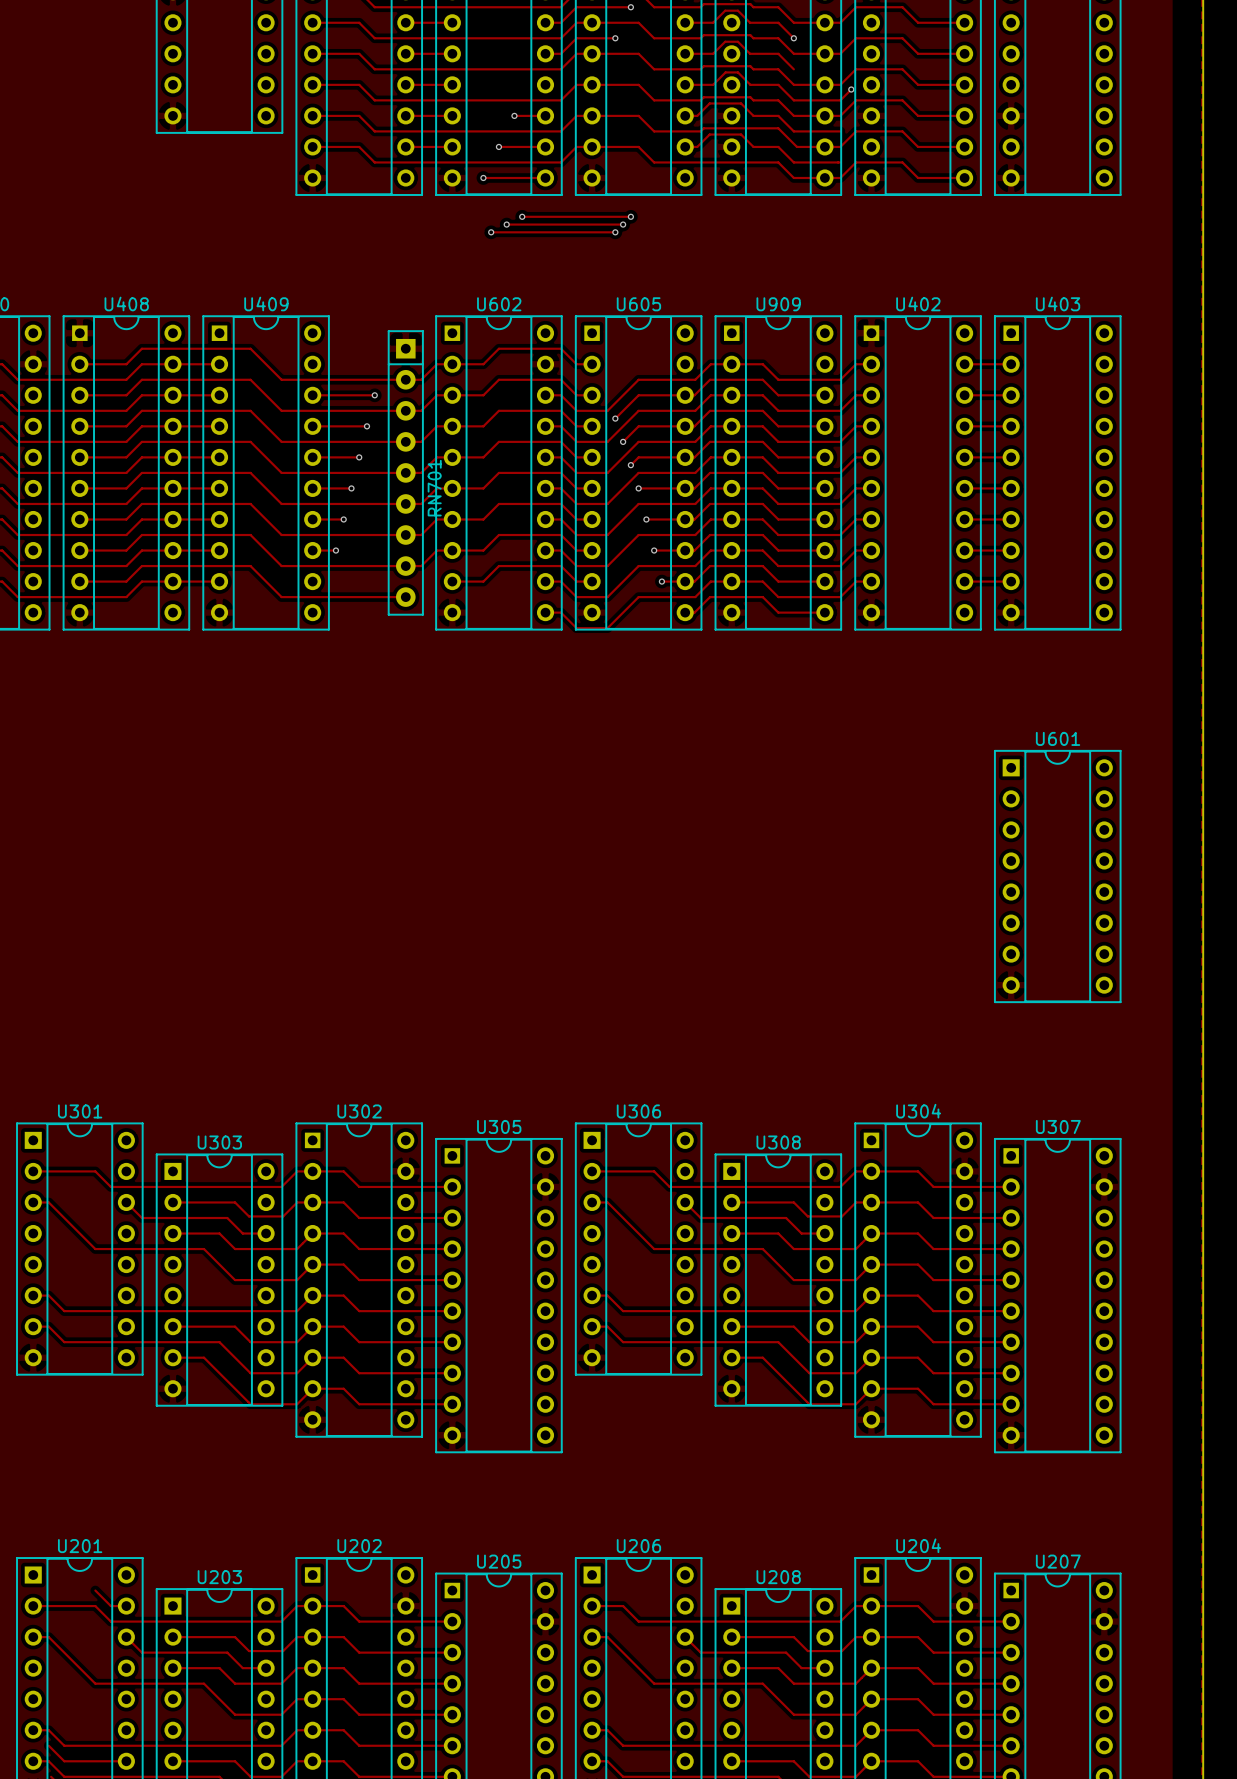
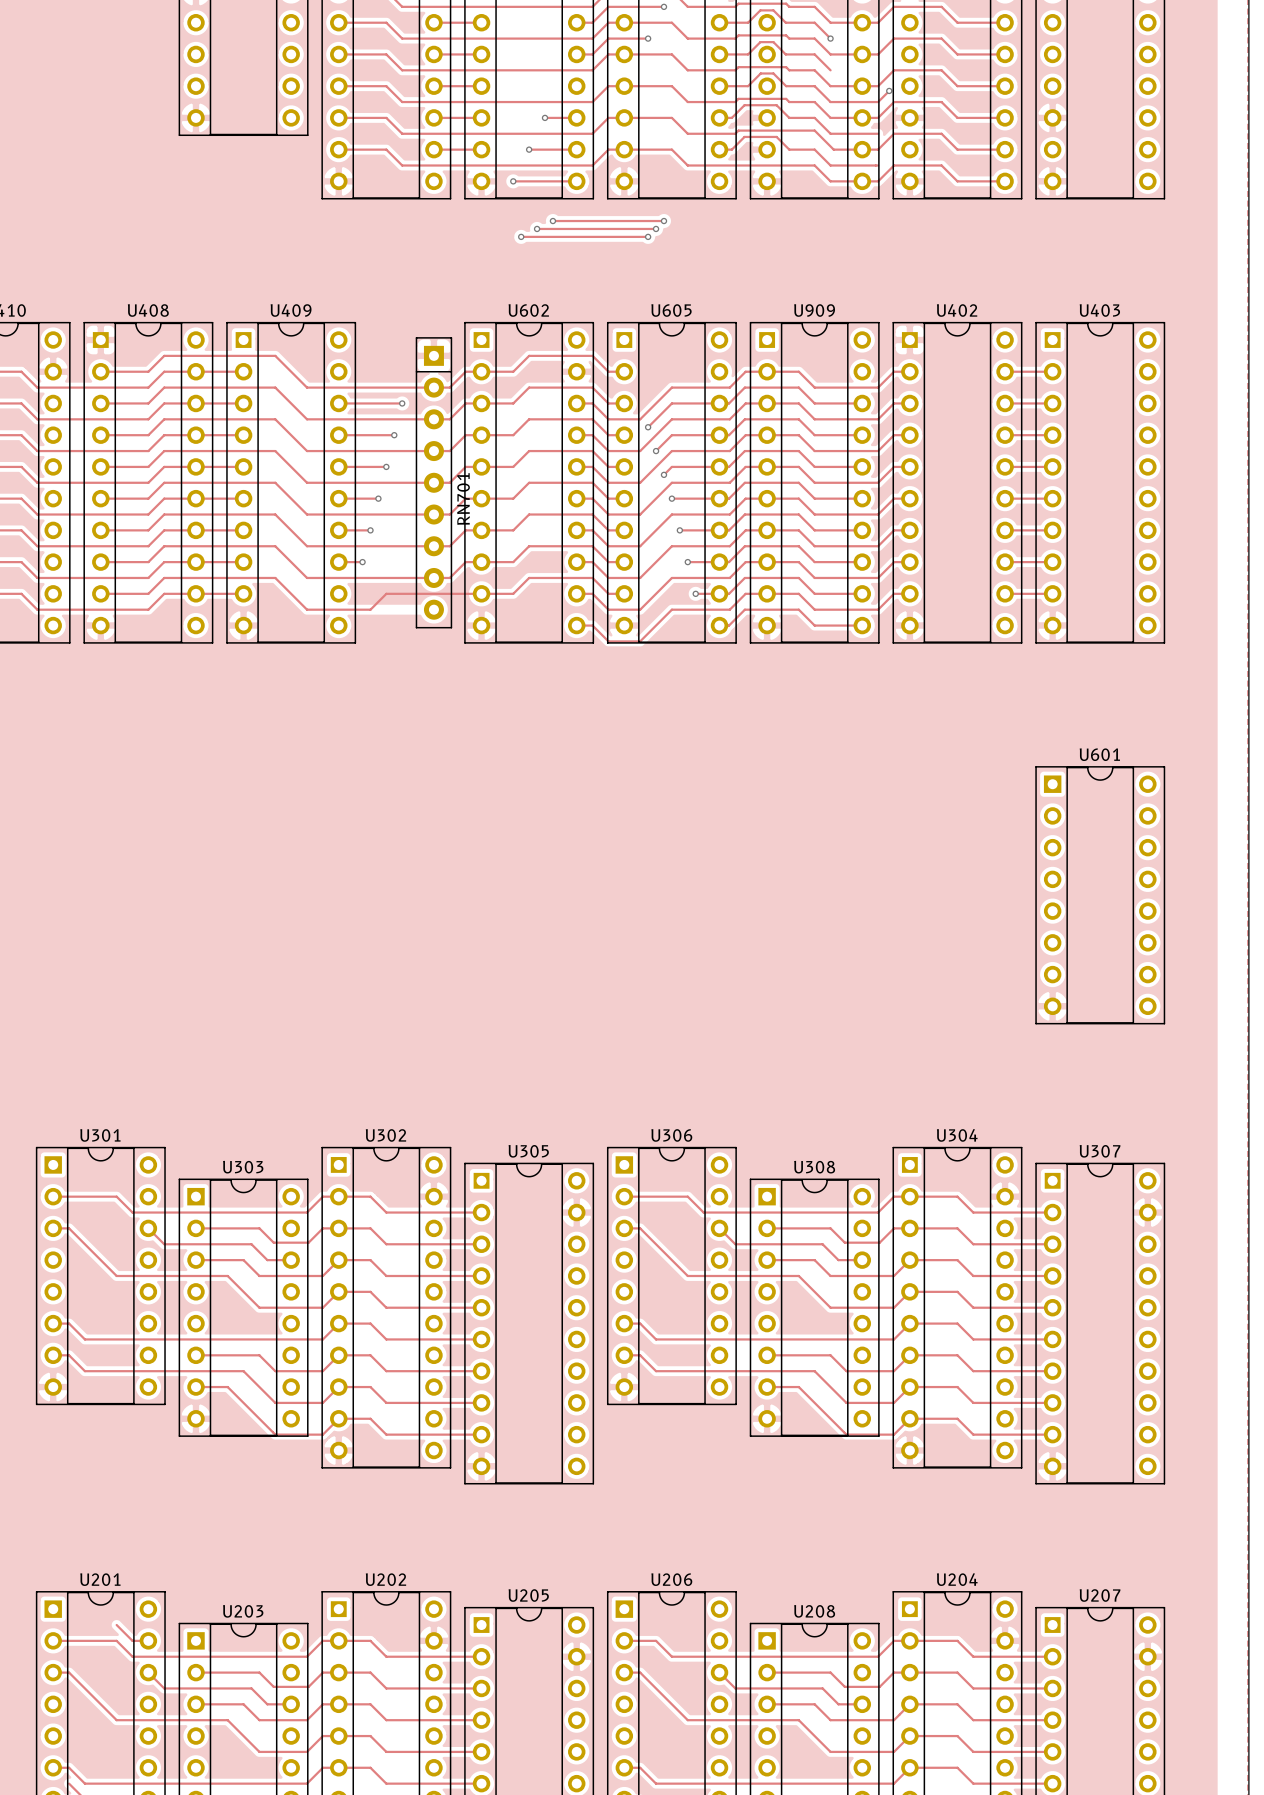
track: (343, 597) (405, 597) -> (370, 609) (386, 593) (481, 593)

